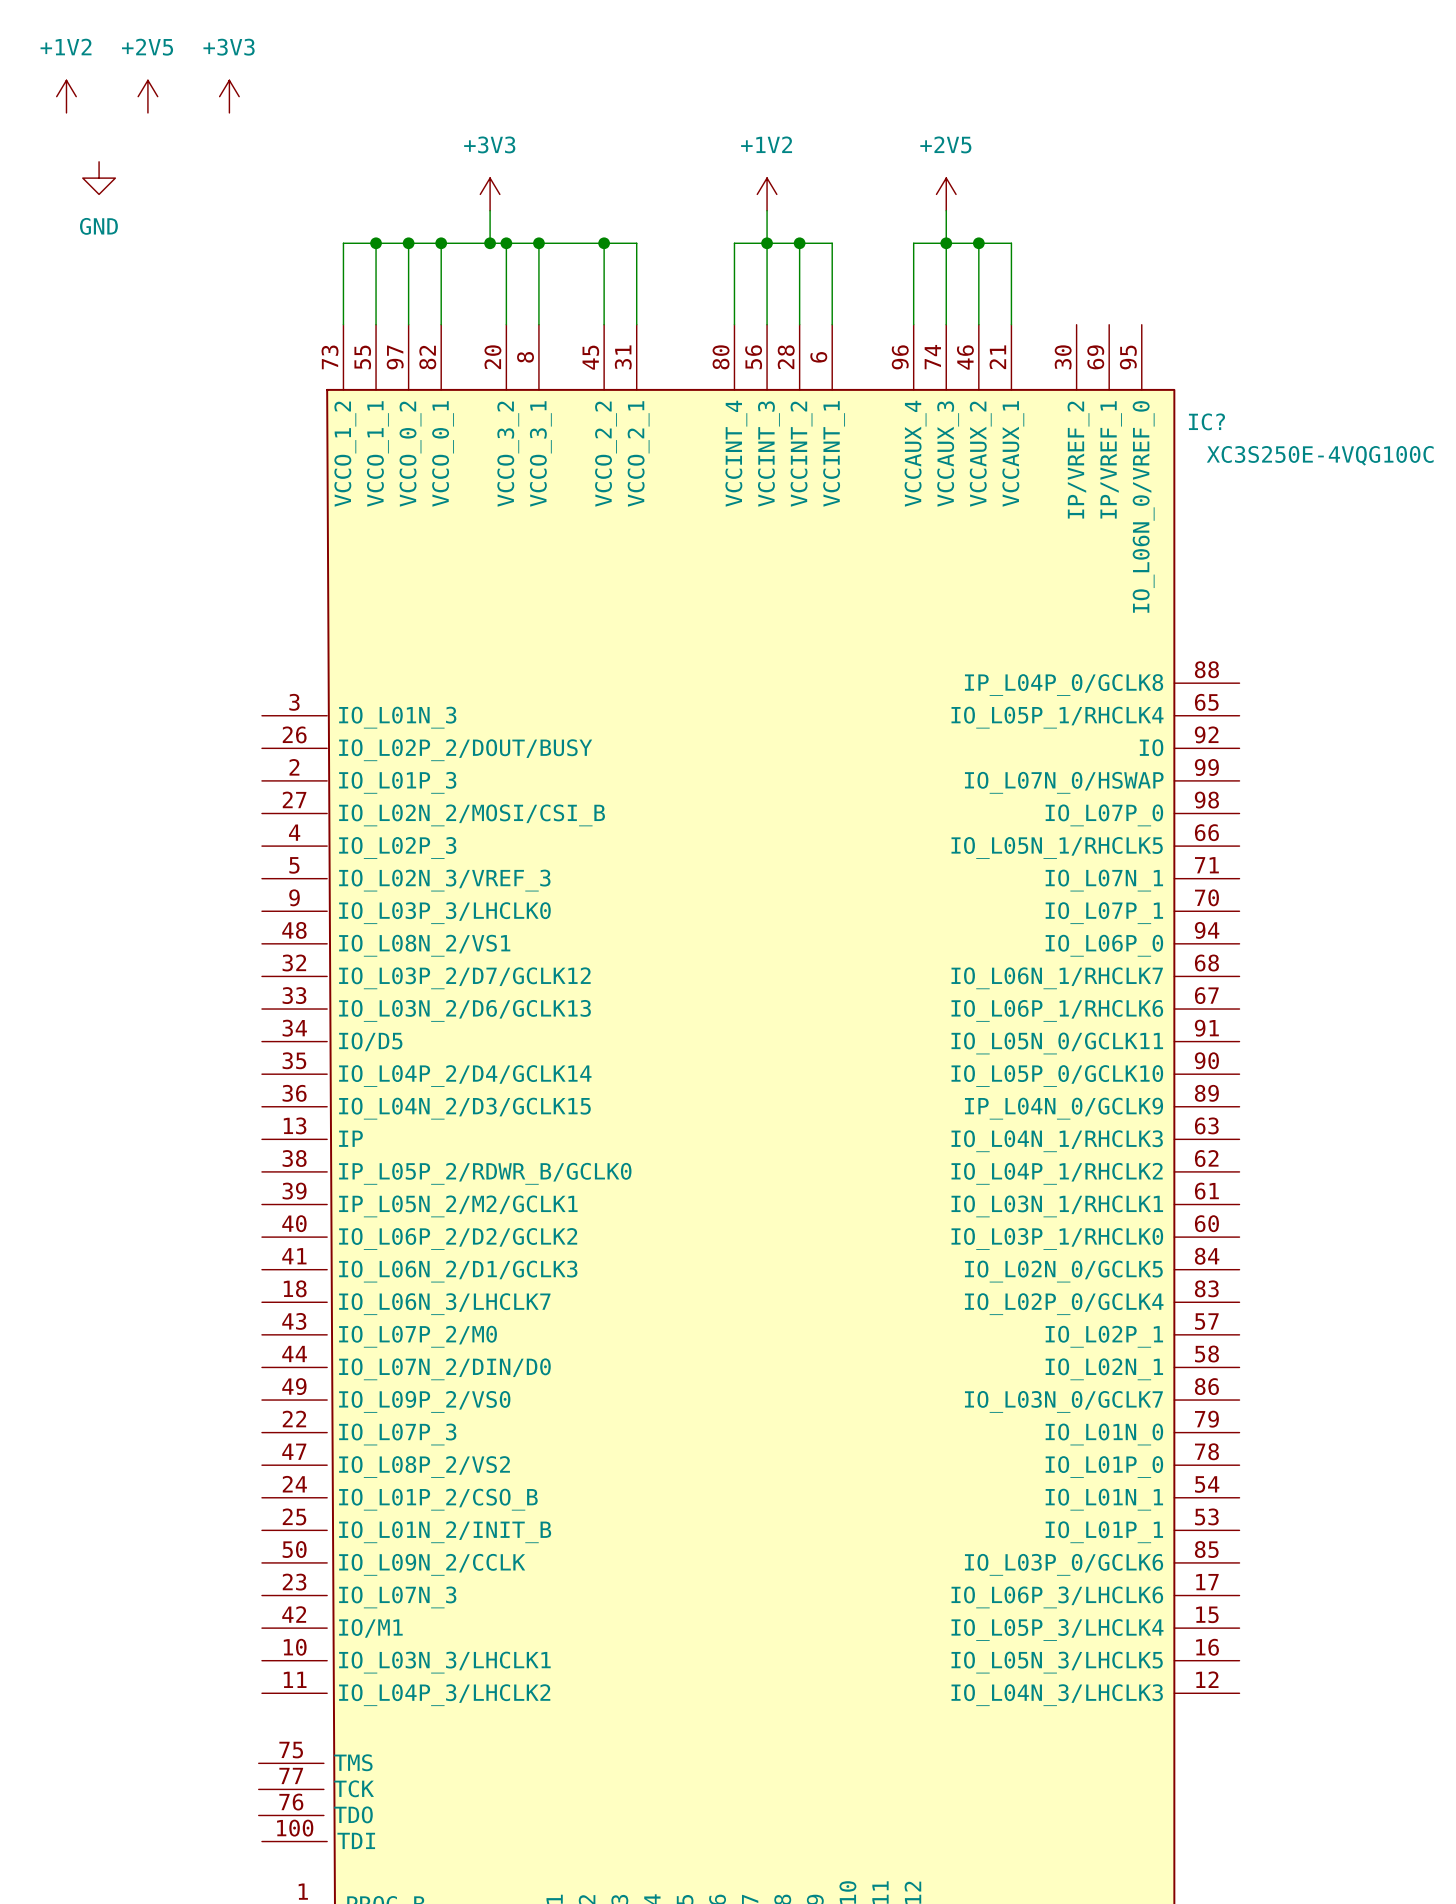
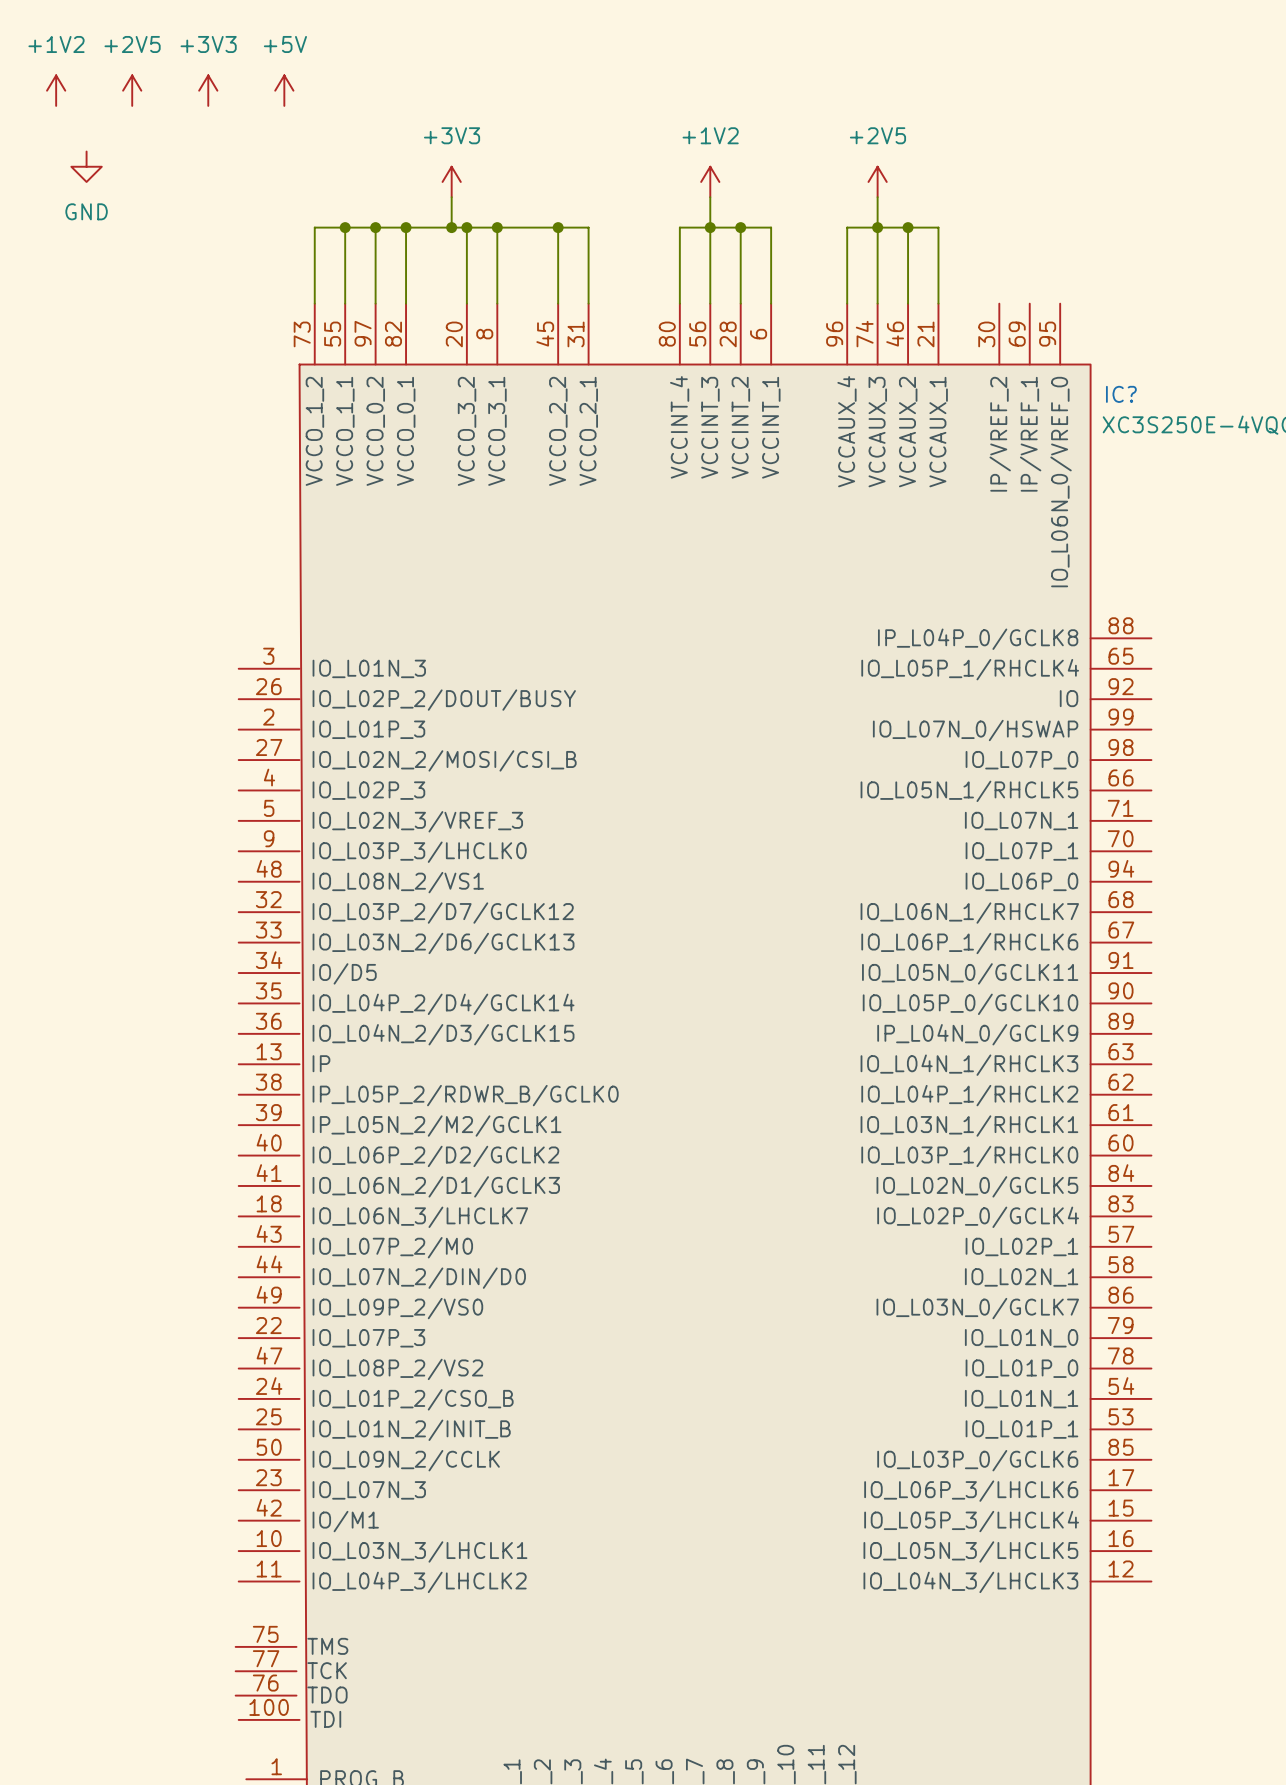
power symbol: none -> +5V (284, 90)

